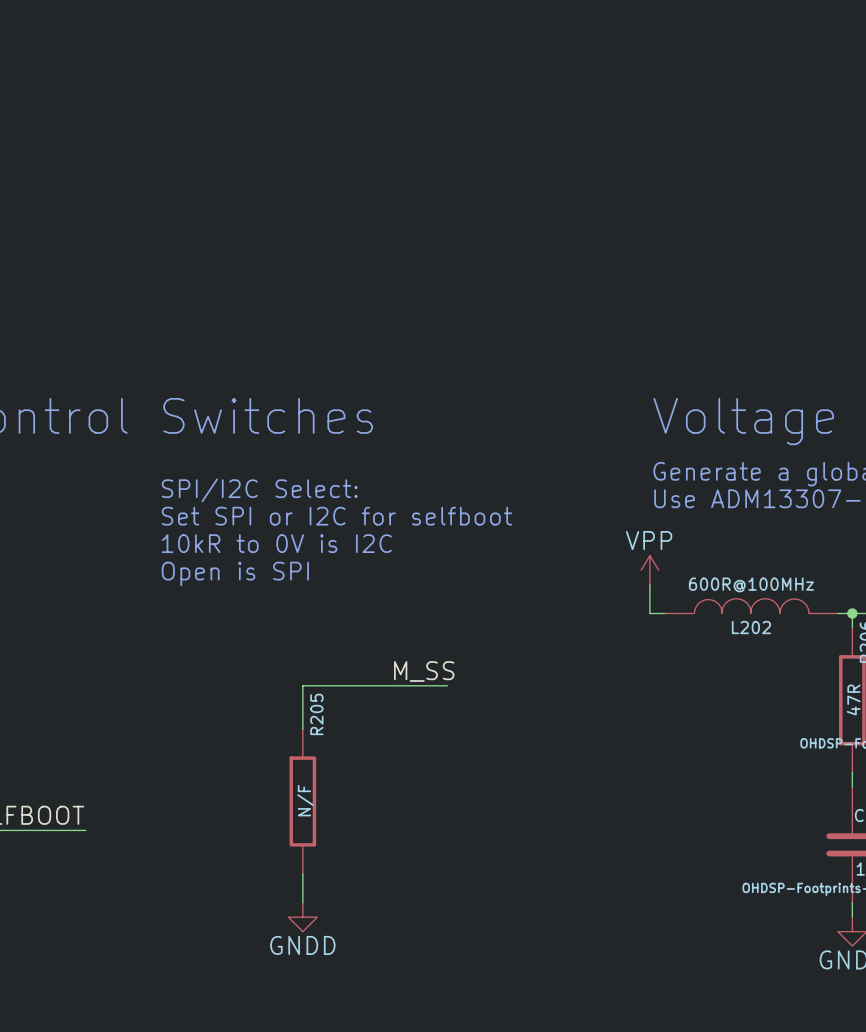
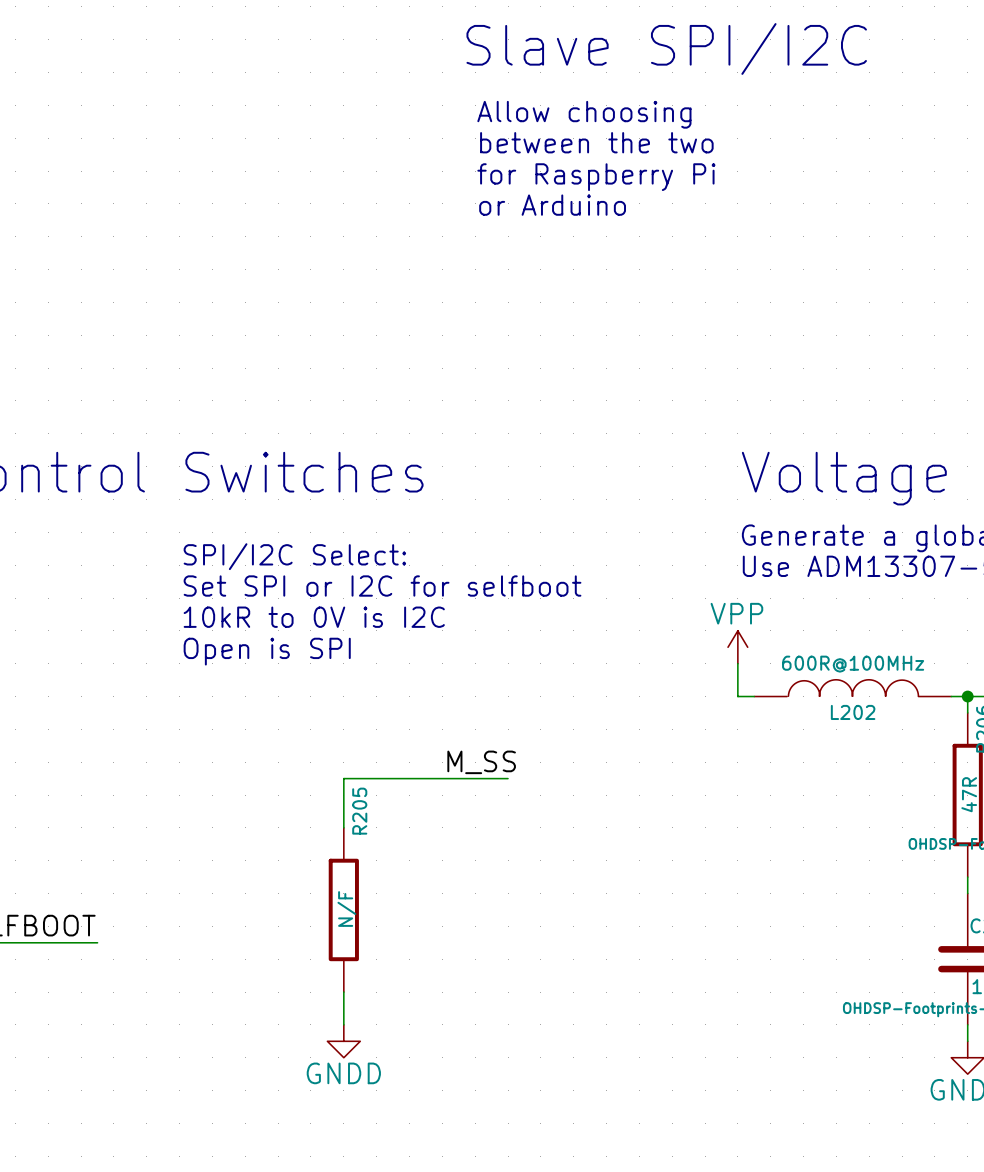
text: none -> Slave SPI/I2C (666, 48)
text: none -> Allow choosing (584, 114)
text: none -> between the two (596, 142)
text: none -> for Raspberry Pi (596, 177)
text: none -> or Arduino (552, 205)

